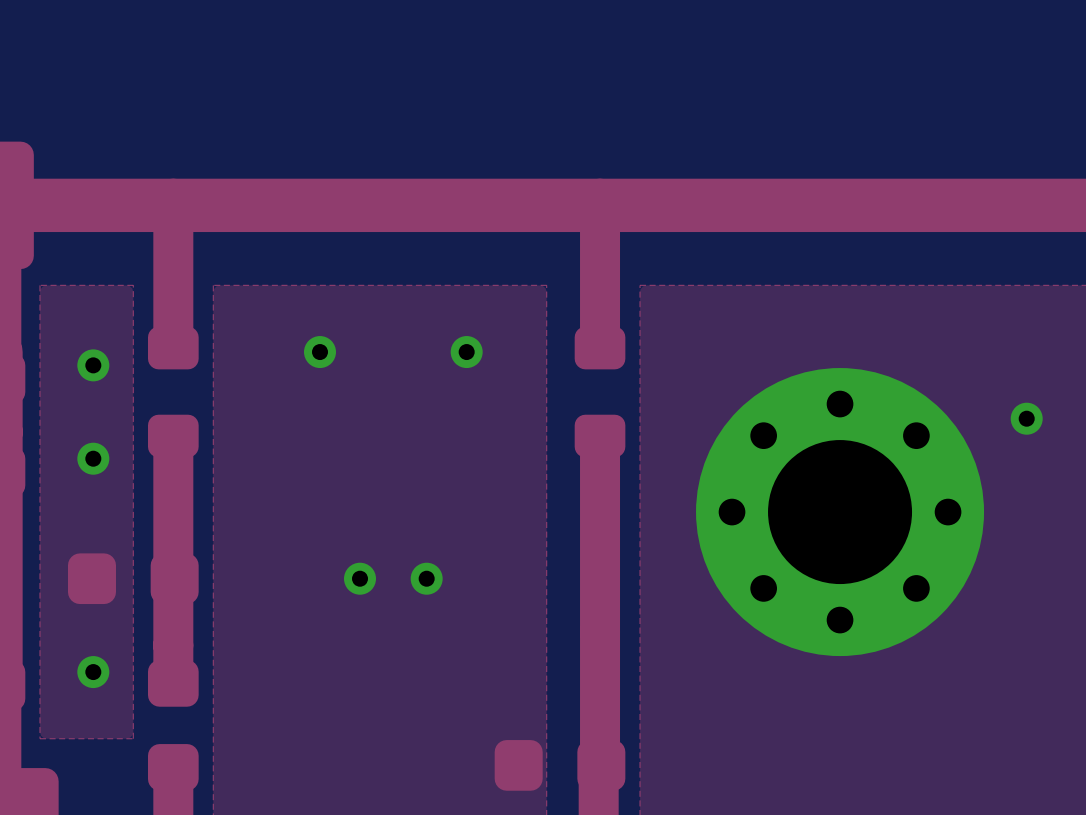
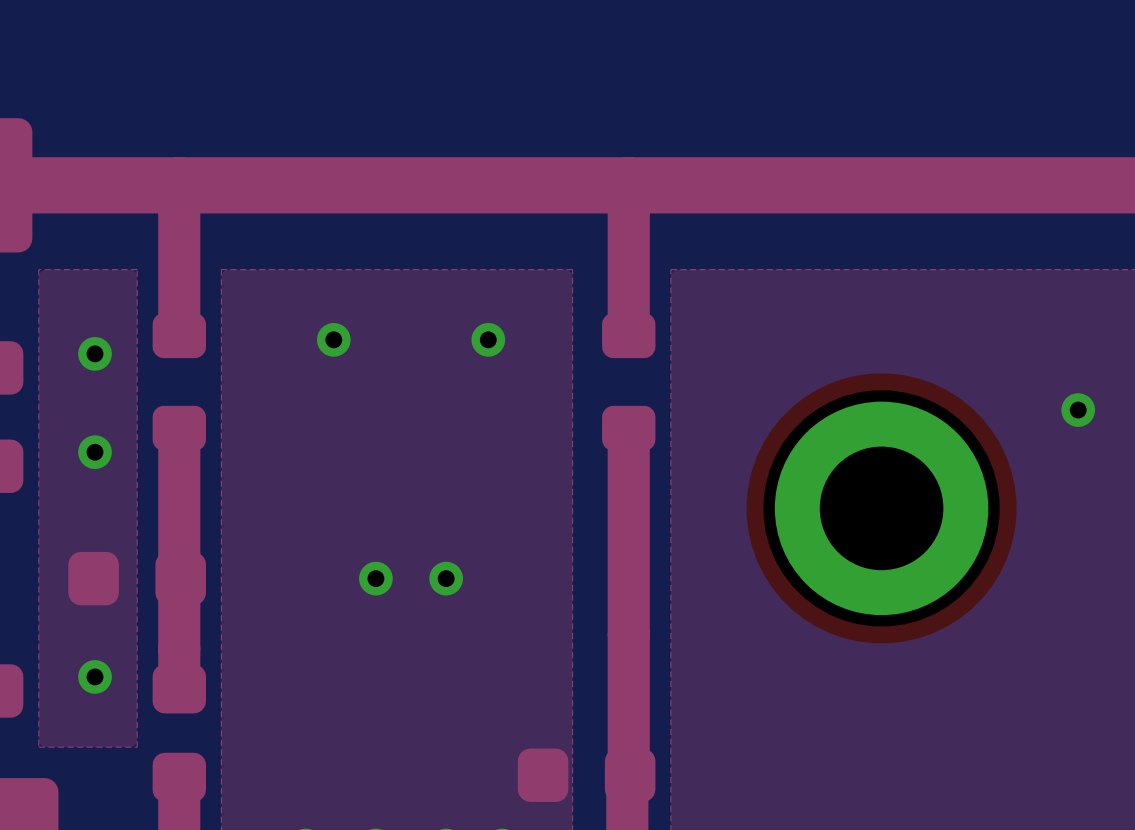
part footprint: [696, 368, 985, 657] -> [774, 401, 989, 616]

